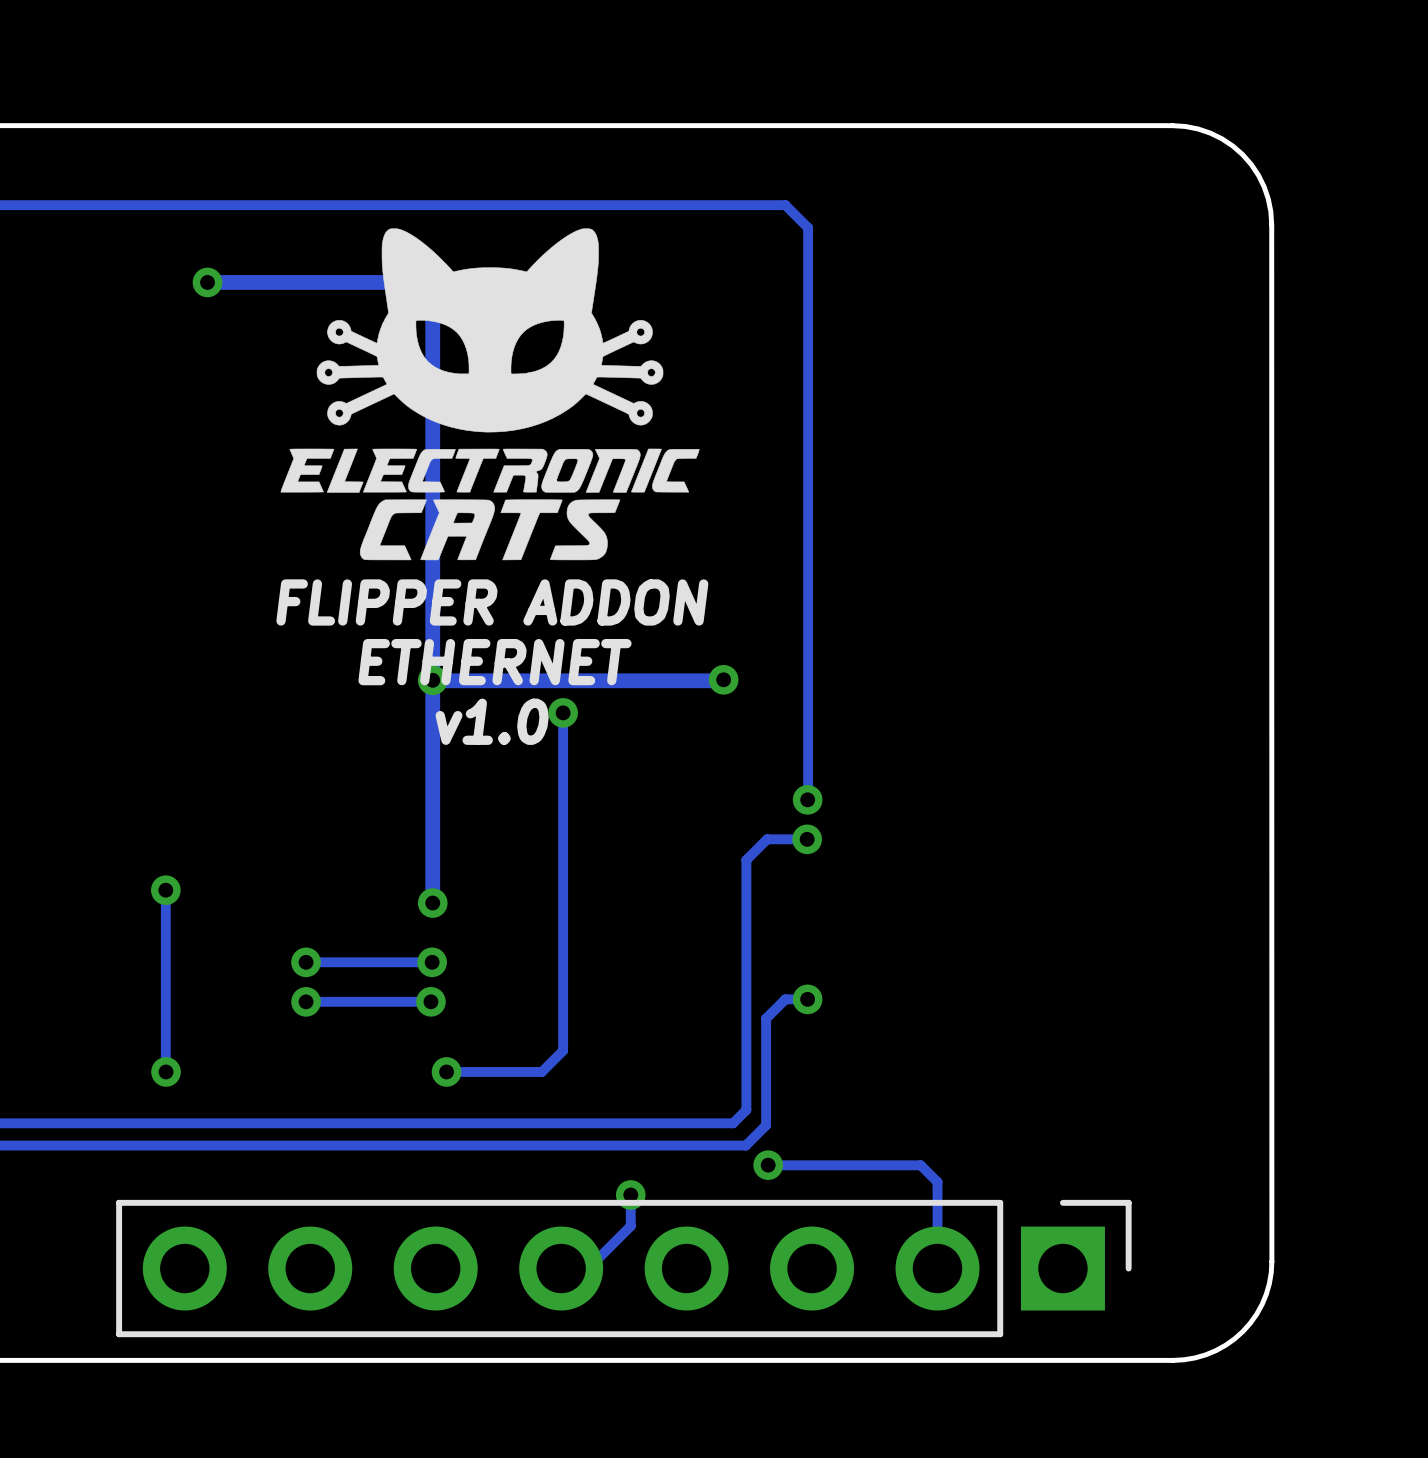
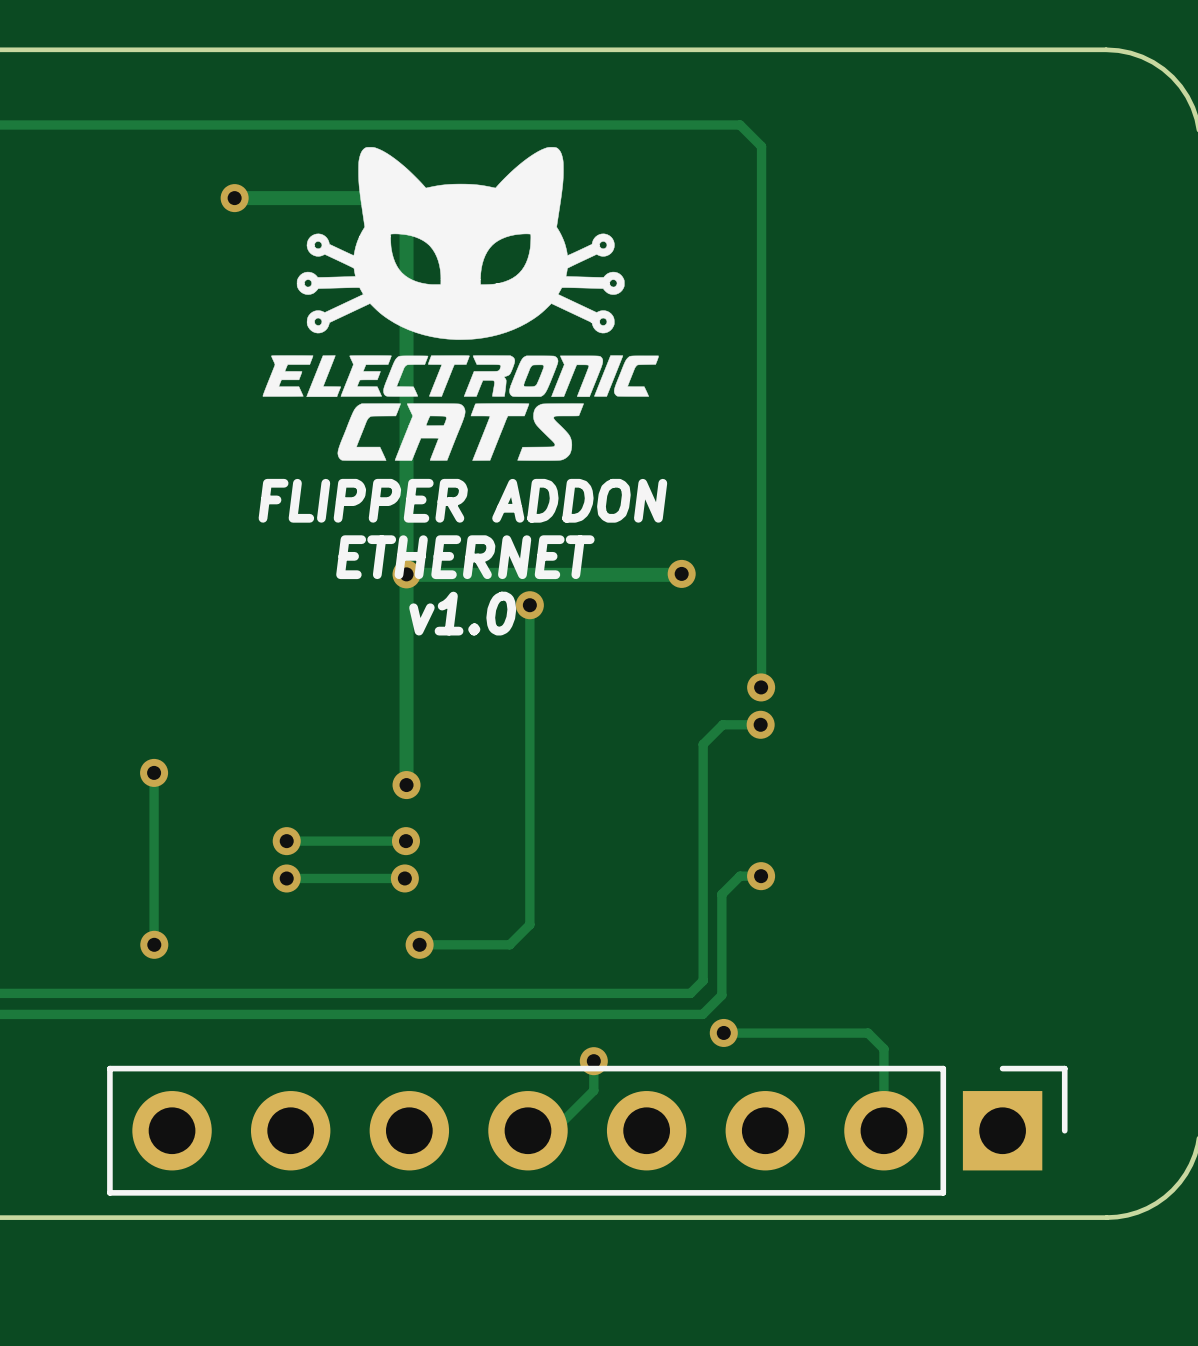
via position: (207, 282) -> (234, 198)
track: (250, 282) (207, 282) -> none

